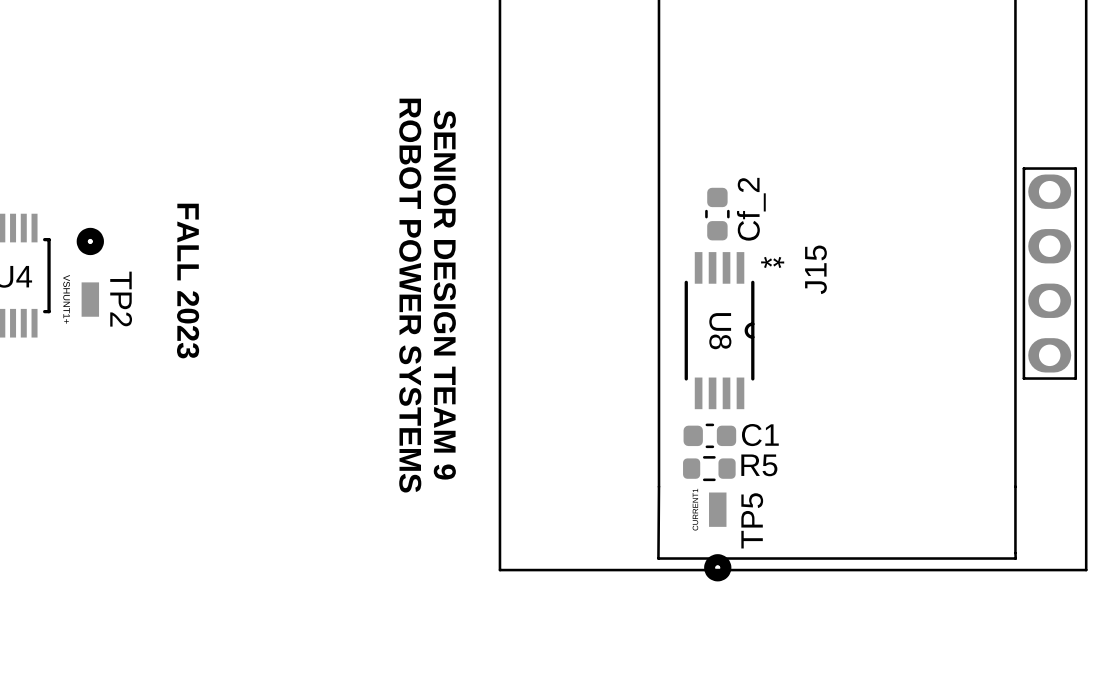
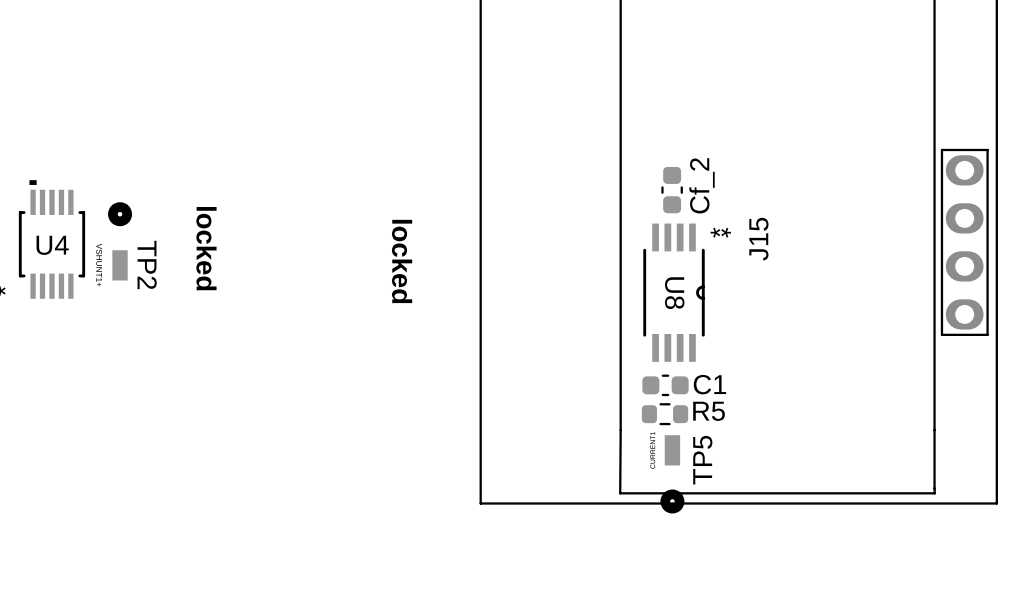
text: FALL 2023 (188, 281) -> locked (206, 248)
text: ROBOT POWER SYSTEMS (410, 295) -> locked (402, 261)
text: SENIOR DESIGN TEAM 9 (444, 295) -> none

